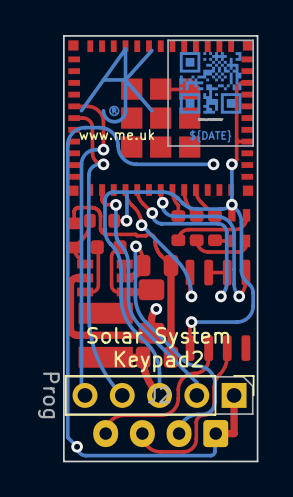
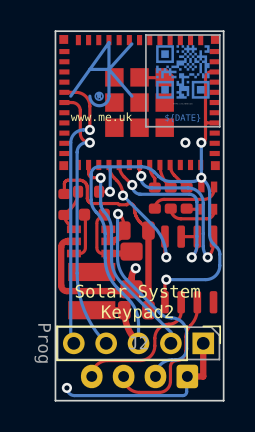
bottom track: (213, 164) (131, 163) (120, 155) (114, 134) (102, 127) (79, 128) (69, 137) (67, 145) (67, 437) (77, 446) -> none

